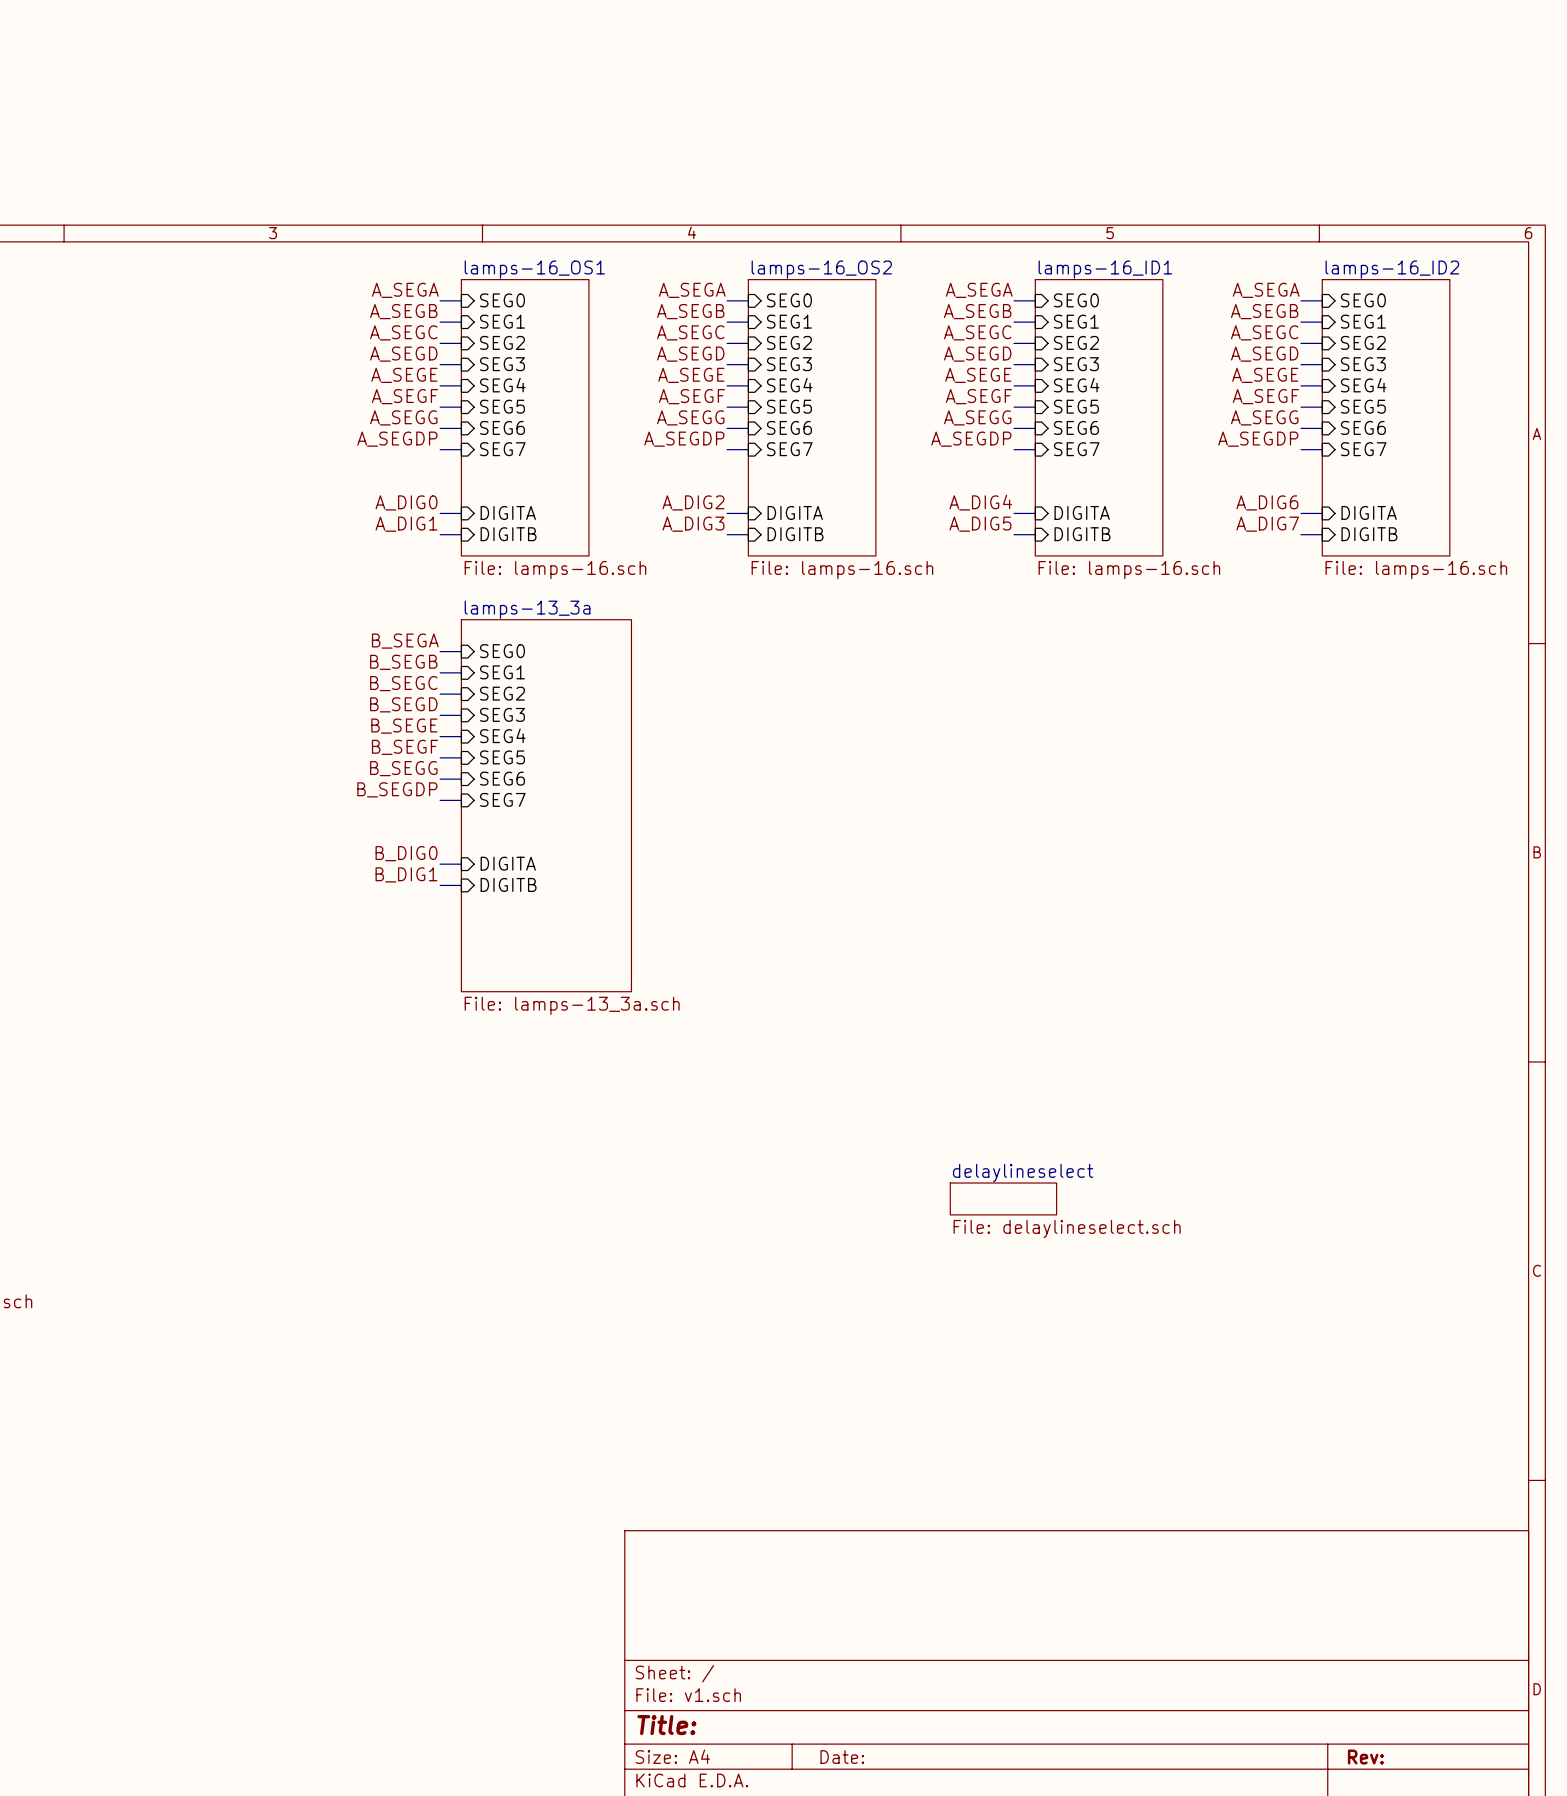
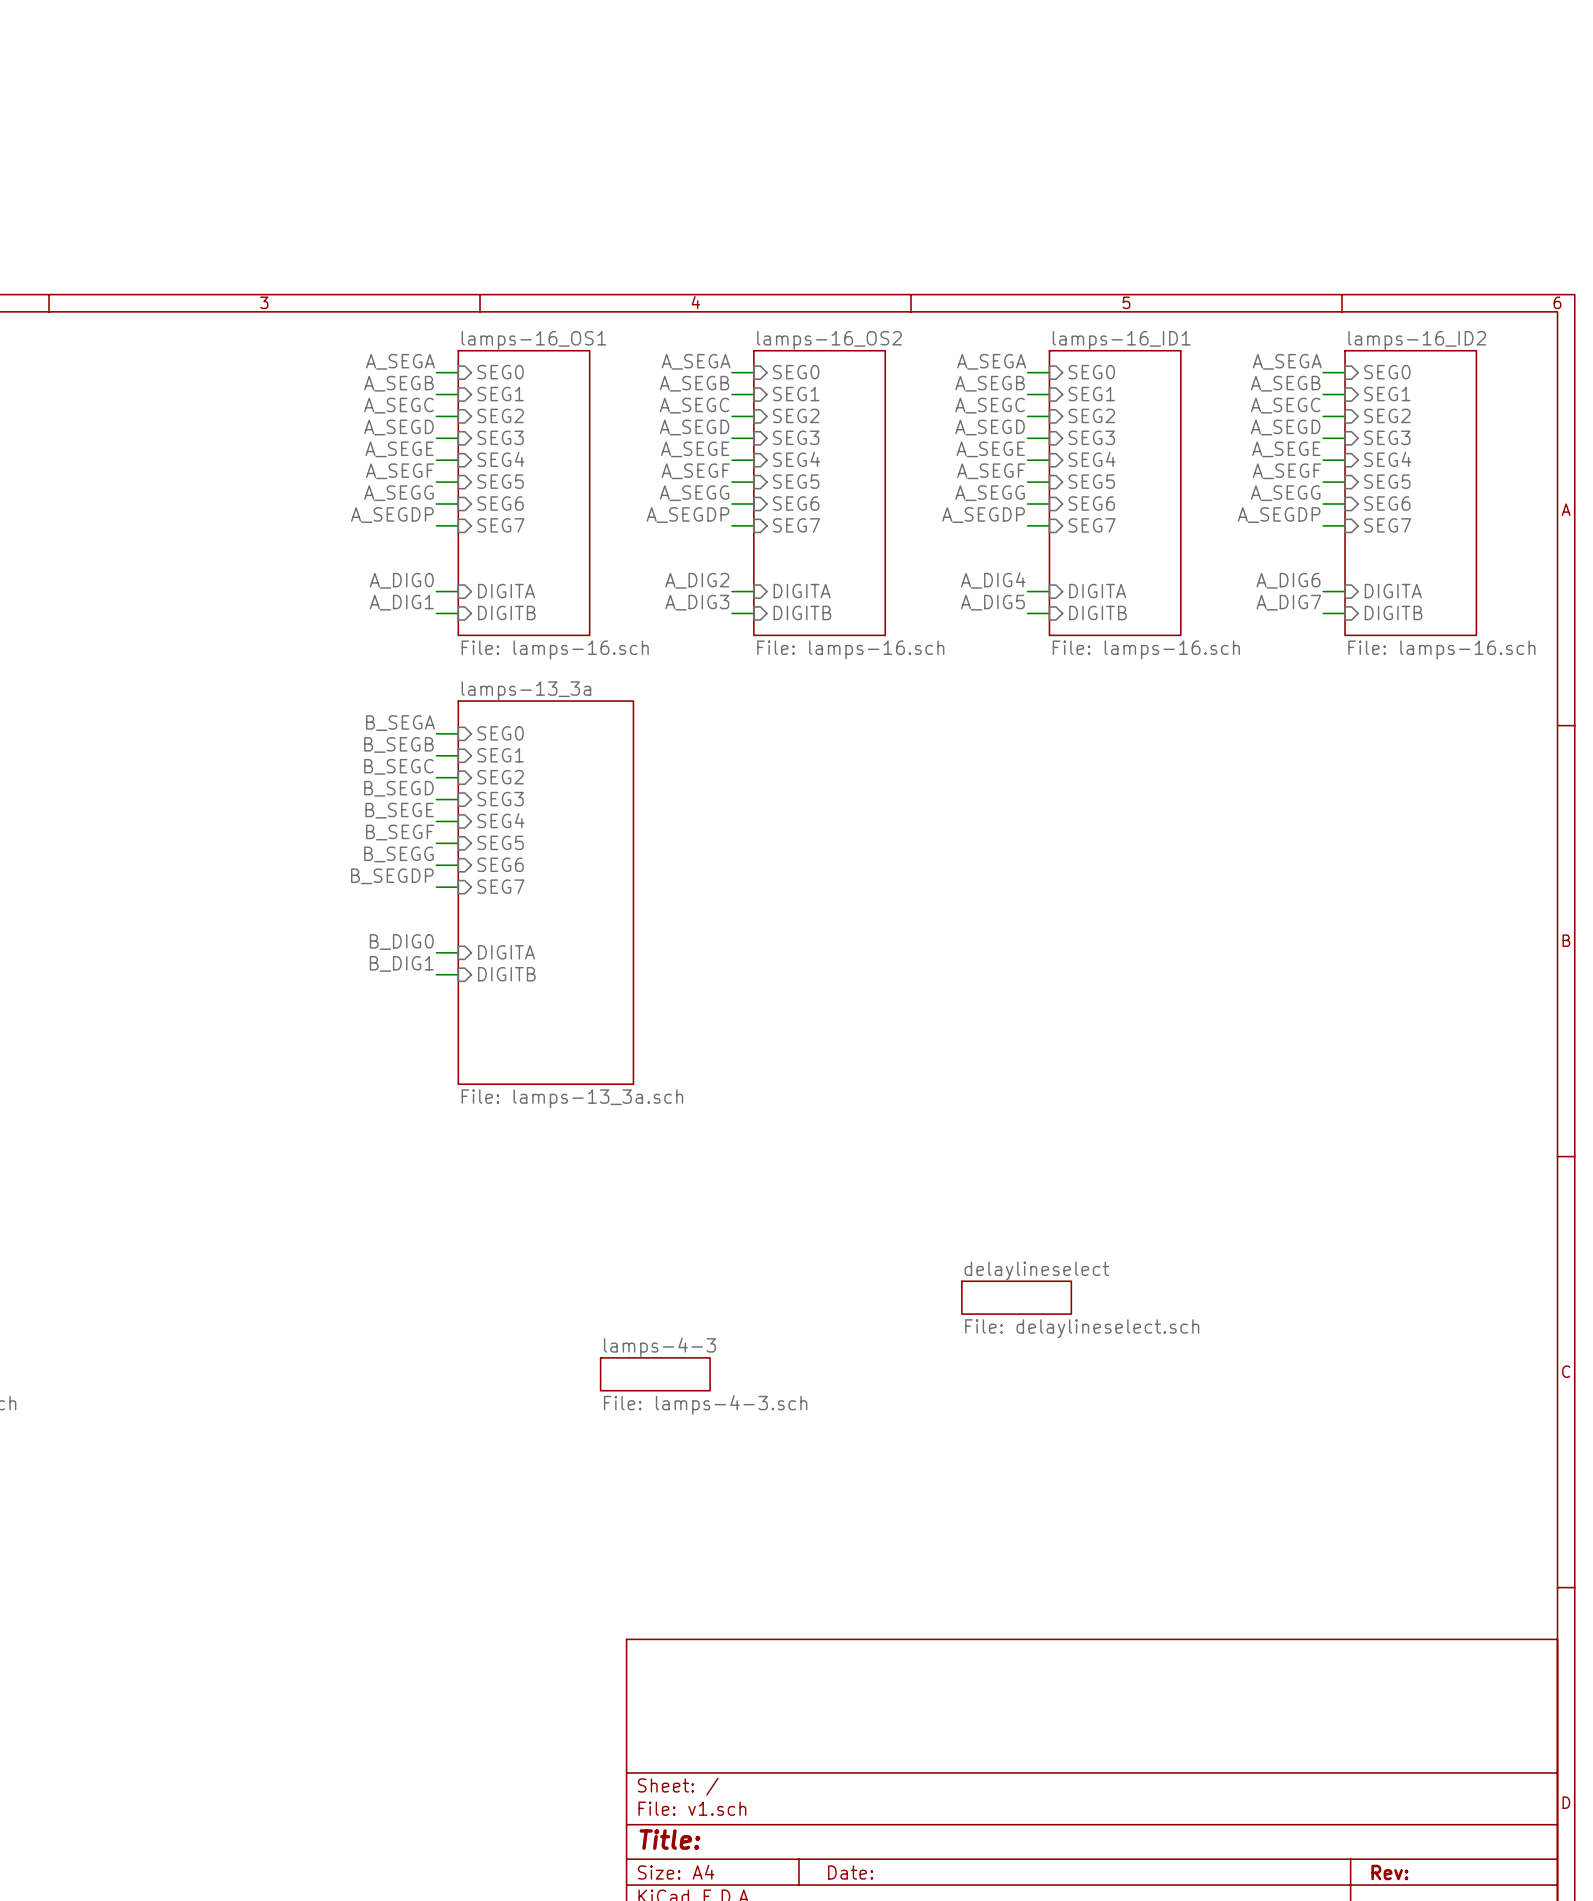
sheet lamps-4-3: none -> File: lamps-4-3.sch (655, 1374)

